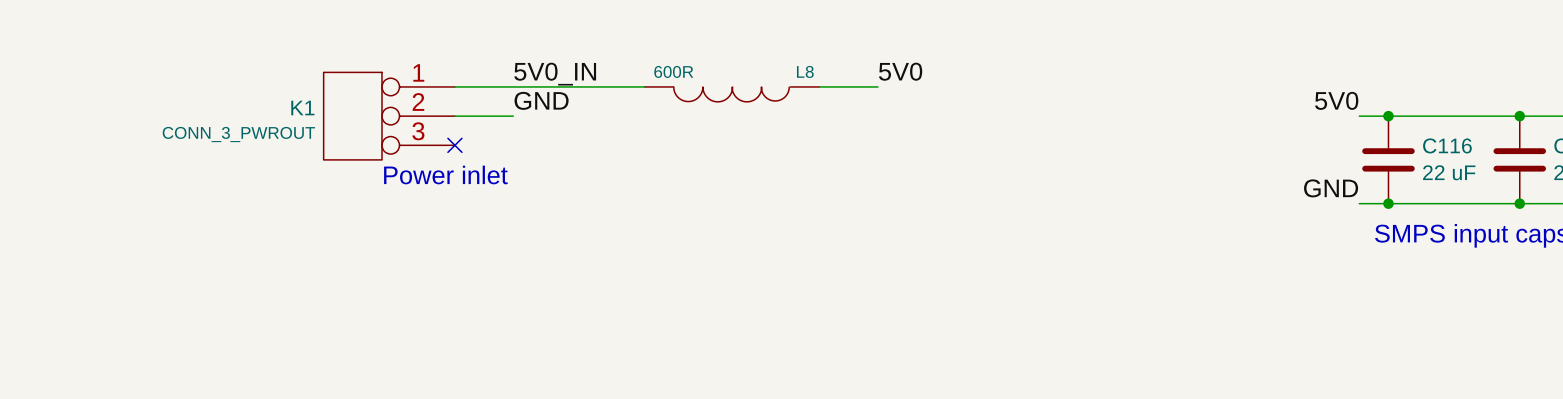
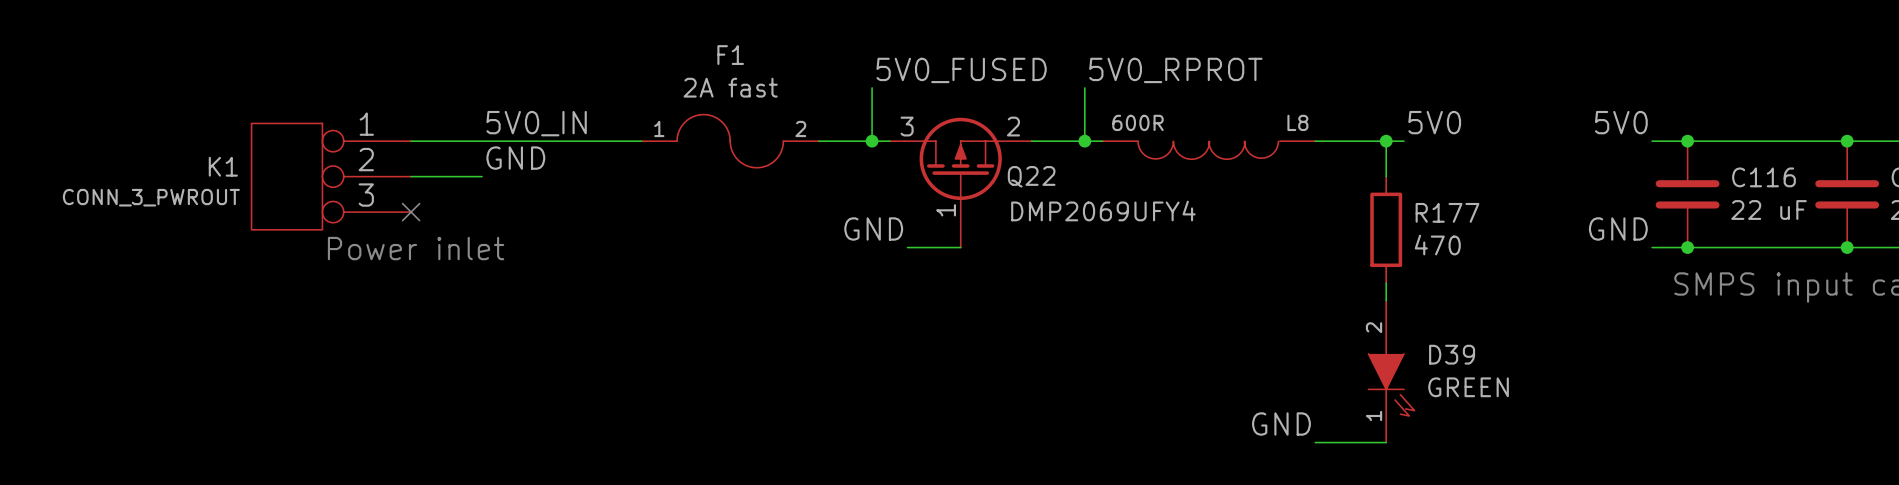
label: none -> 5V0_FUSED (961, 70)
label: none -> 5V0_RPROT (1175, 70)
label position: 5V0 (900, 71) -> 5V0 (1434, 122)
wire: none -> (872, 87) (872, 141)
wire: none -> (1084, 87) (1084, 141)
label position: 5V0_IN (555, 74) -> 5V0_IN (536, 123)
wire: (454, 86) (644, 86) -> none
wire: (819, 86) (877, 86) -> (1031, 141) (1102, 141)
L8 position: (732, 94) -> (1208, 150)
label position: GND (541, 100) -> GND (515, 158)
wire: none -> (411, 141) (552, 141)
K1 position: (389, 116) -> (331, 176)
wire: none -> (623, 141) (641, 141)
F1: none -> 2A fast (730, 141)
wire: none -> (818, 141) (889, 141)
junction: none -> (872, 141)
junction: none -> (1084, 141)
wire: none -> (1315, 141) (1403, 141)
wire: none -> (1386, 141) (1386, 176)
junction: none -> (1386, 141)
wire: none -> (411, 176) (482, 176)
no-connect mark: (454, 145) -> none
Q22: none -> DMP2069UFY4 (960, 182)
no-connect mark: none -> (411, 212)
text position: Power inlet (445, 174) -> Power inlet (416, 248)
label: none -> GND (873, 228)
R177: none -> 470 (1386, 229)
wire: none -> (907, 247) (960, 247)
wire: none -> (1386, 283) (1386, 300)
D39: none -> GREEN (1391, 371)
label: none -> GND (1281, 424)
wire: none -> (1315, 442) (1386, 442)

